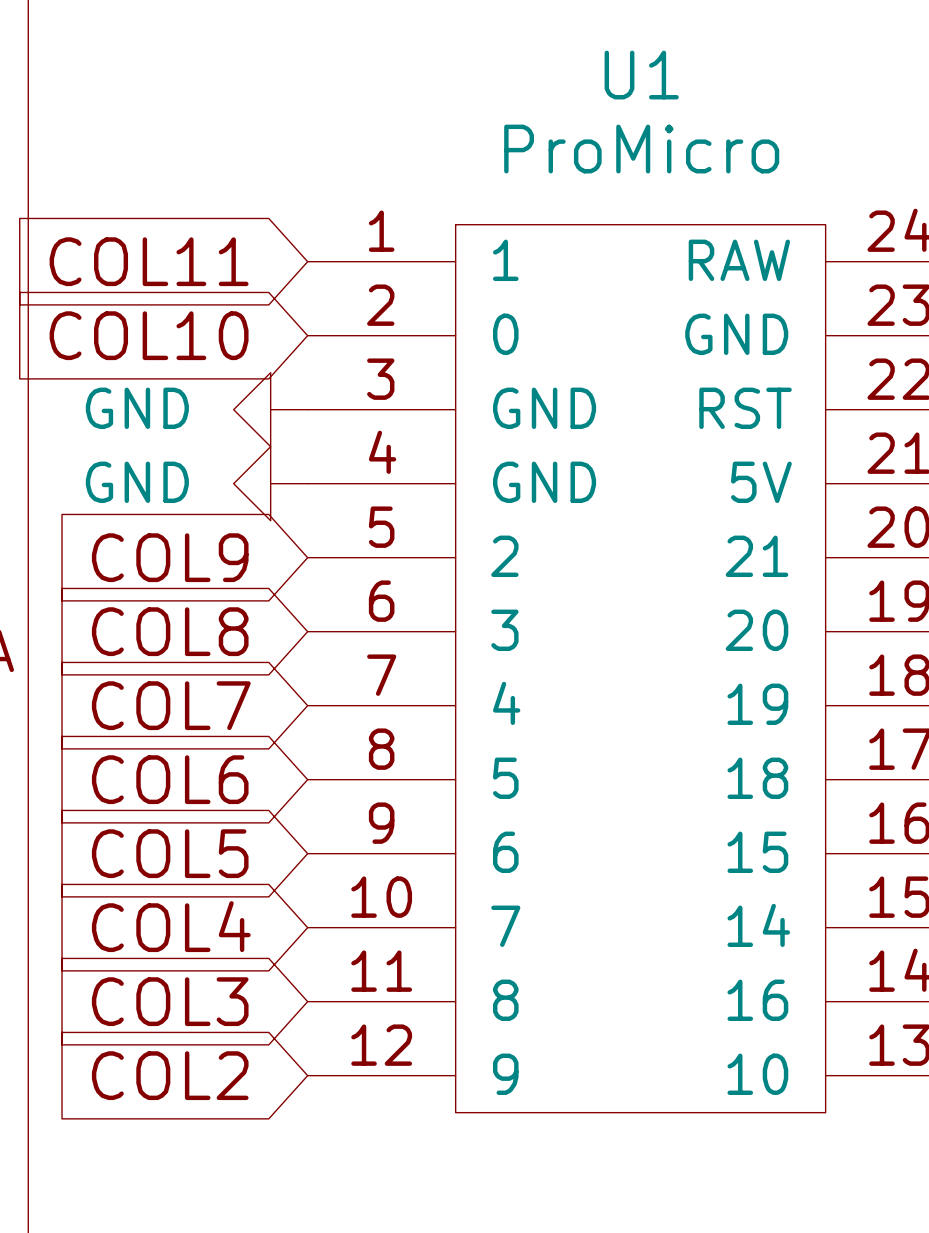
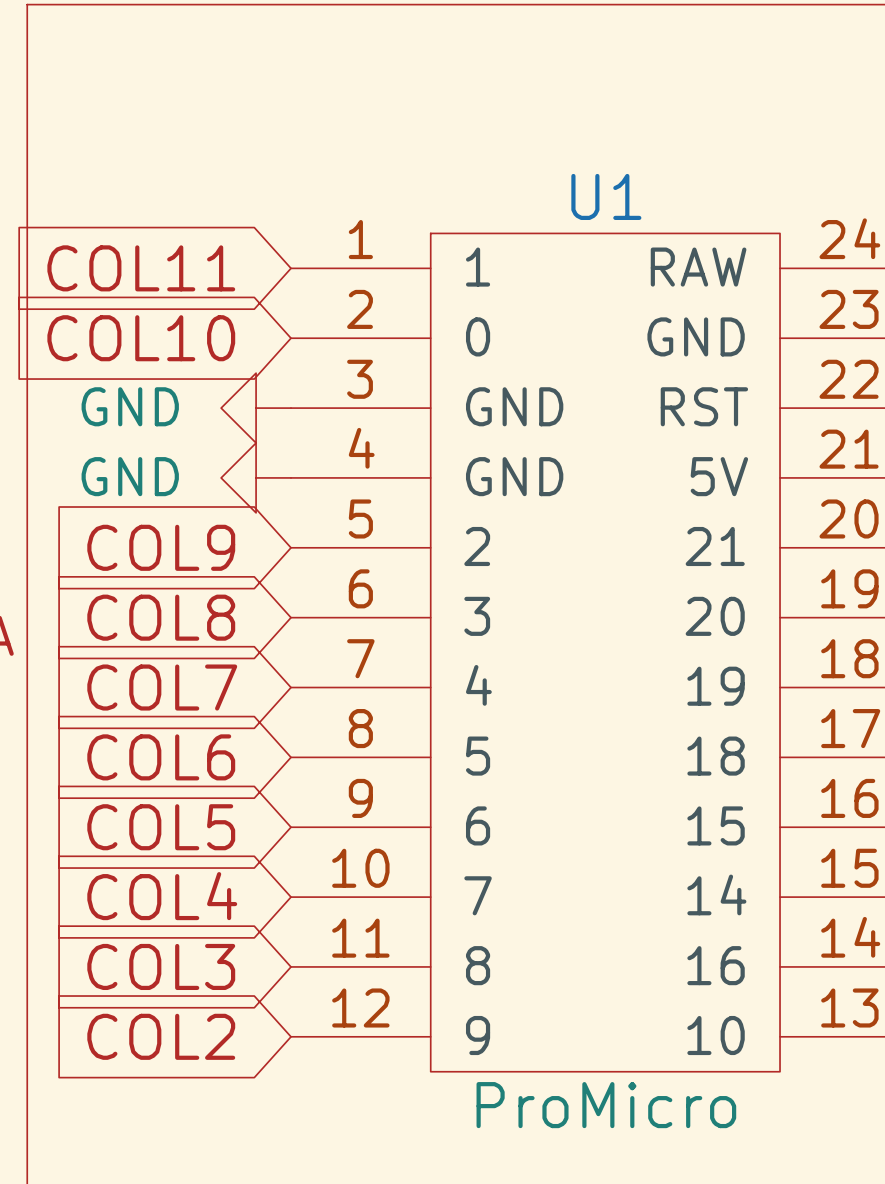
U1 name position: U1 (641, 75) -> U1 (606, 196)
U1 value position: ProMicro (641, 149) -> ProMicro (606, 1105)

